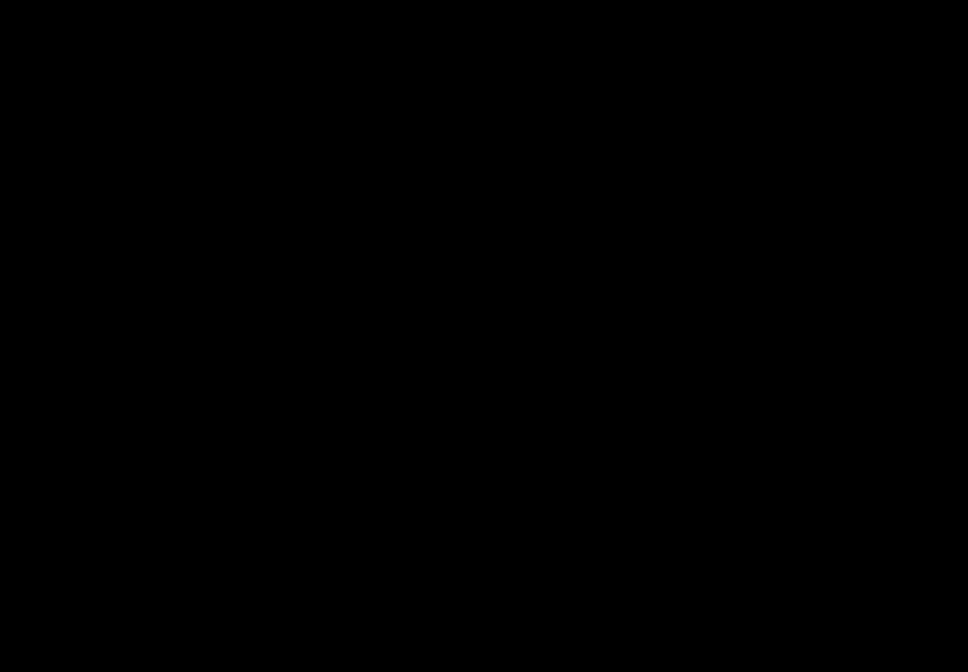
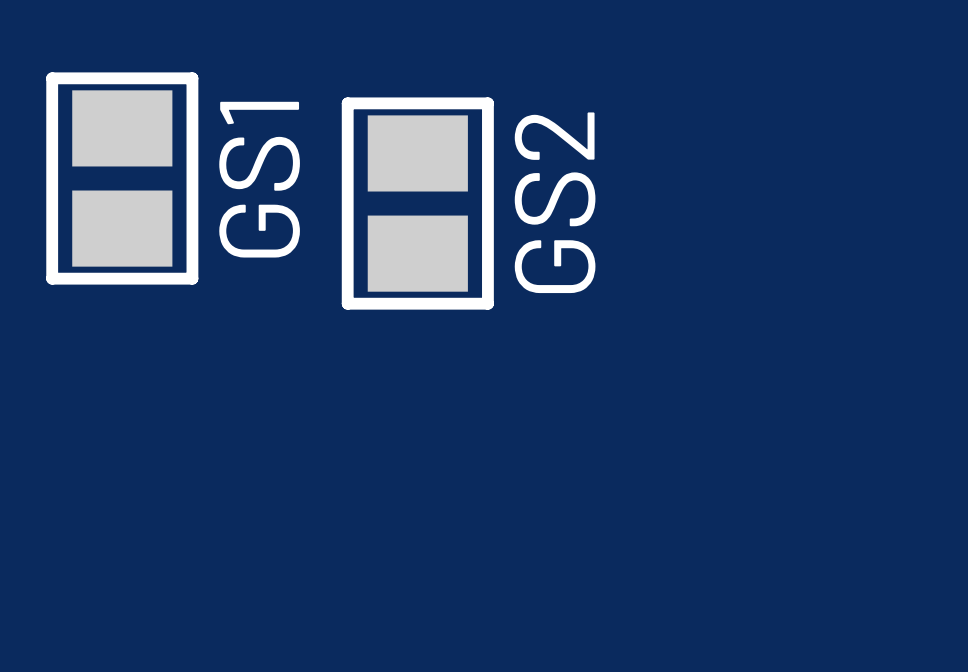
GS1: none -> (122, 178)
GS2: none -> (417, 203)

